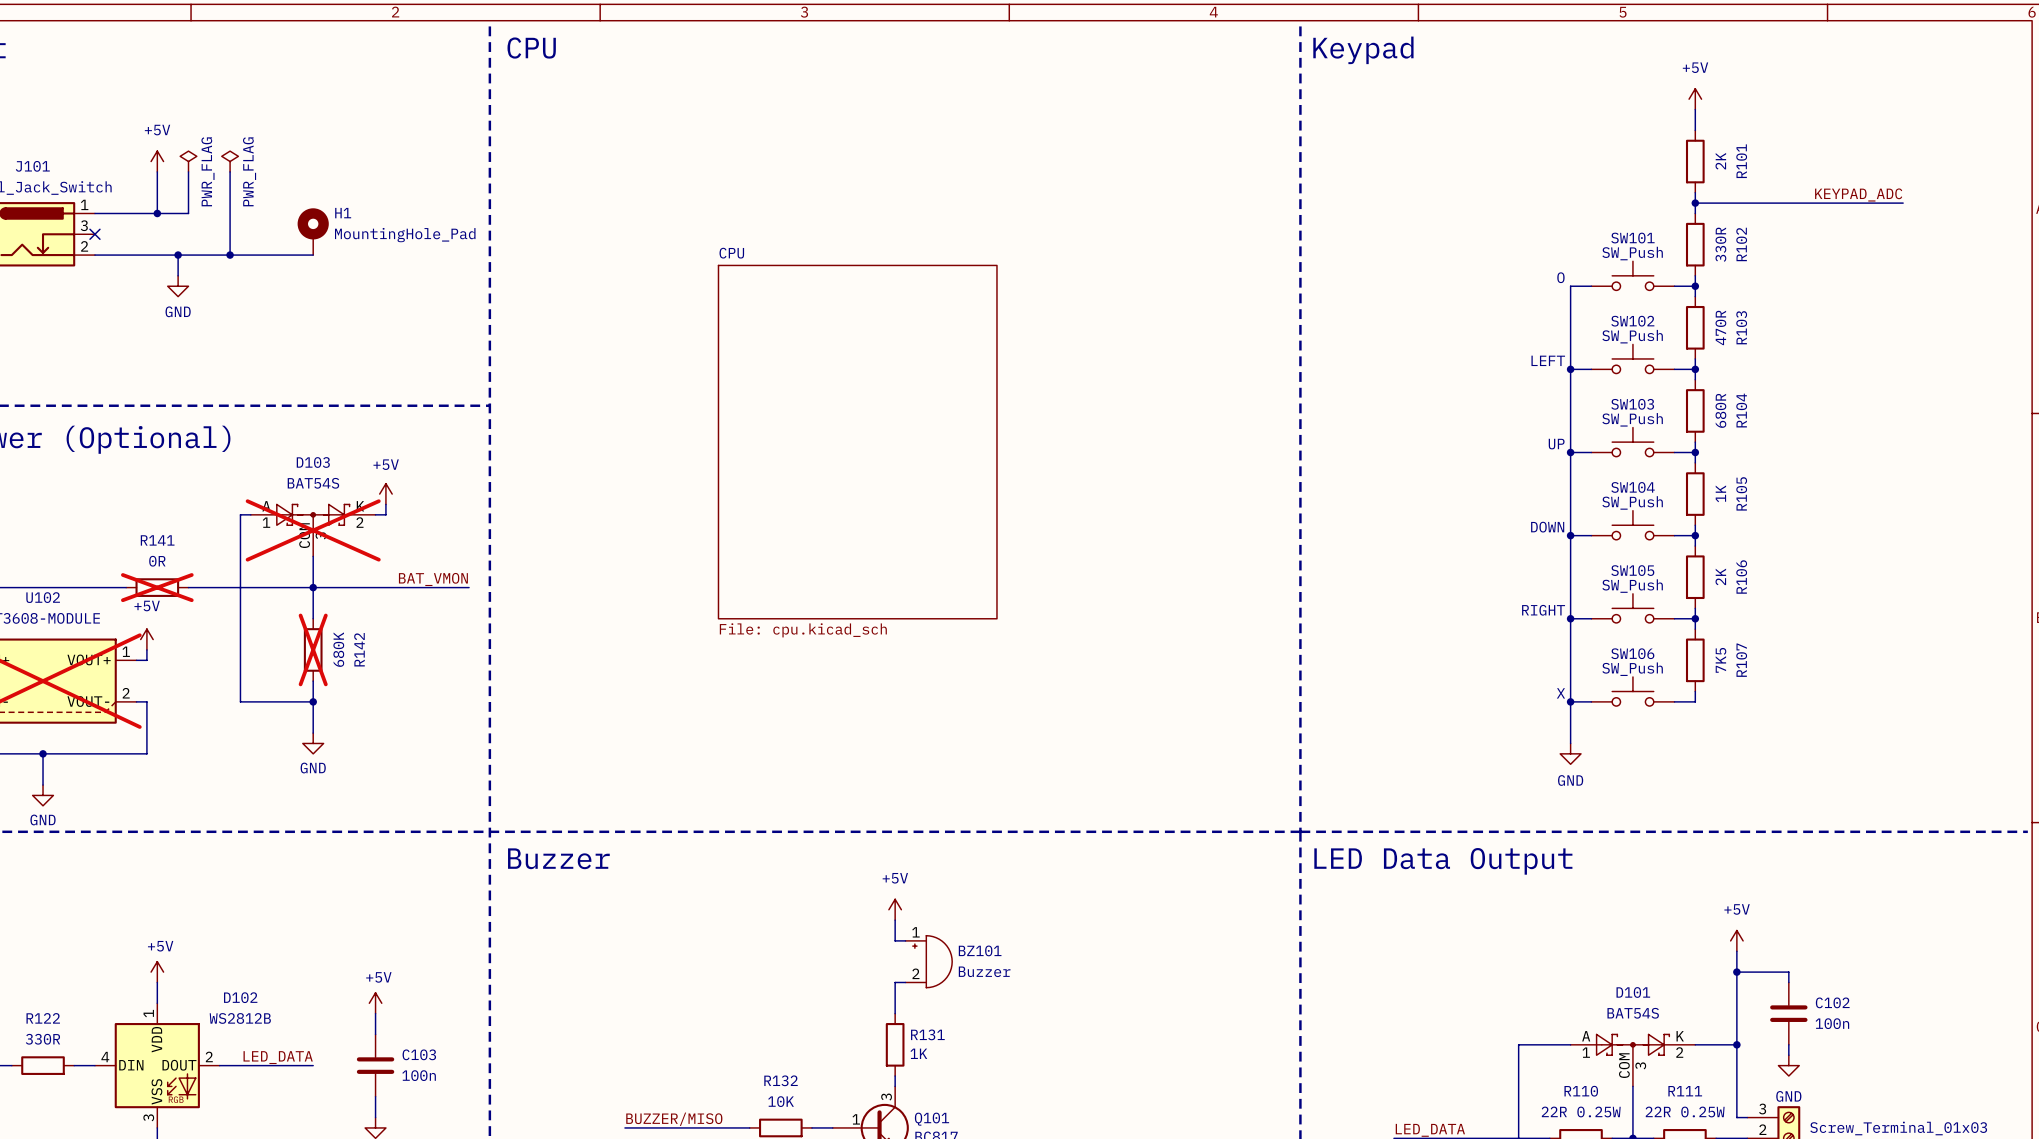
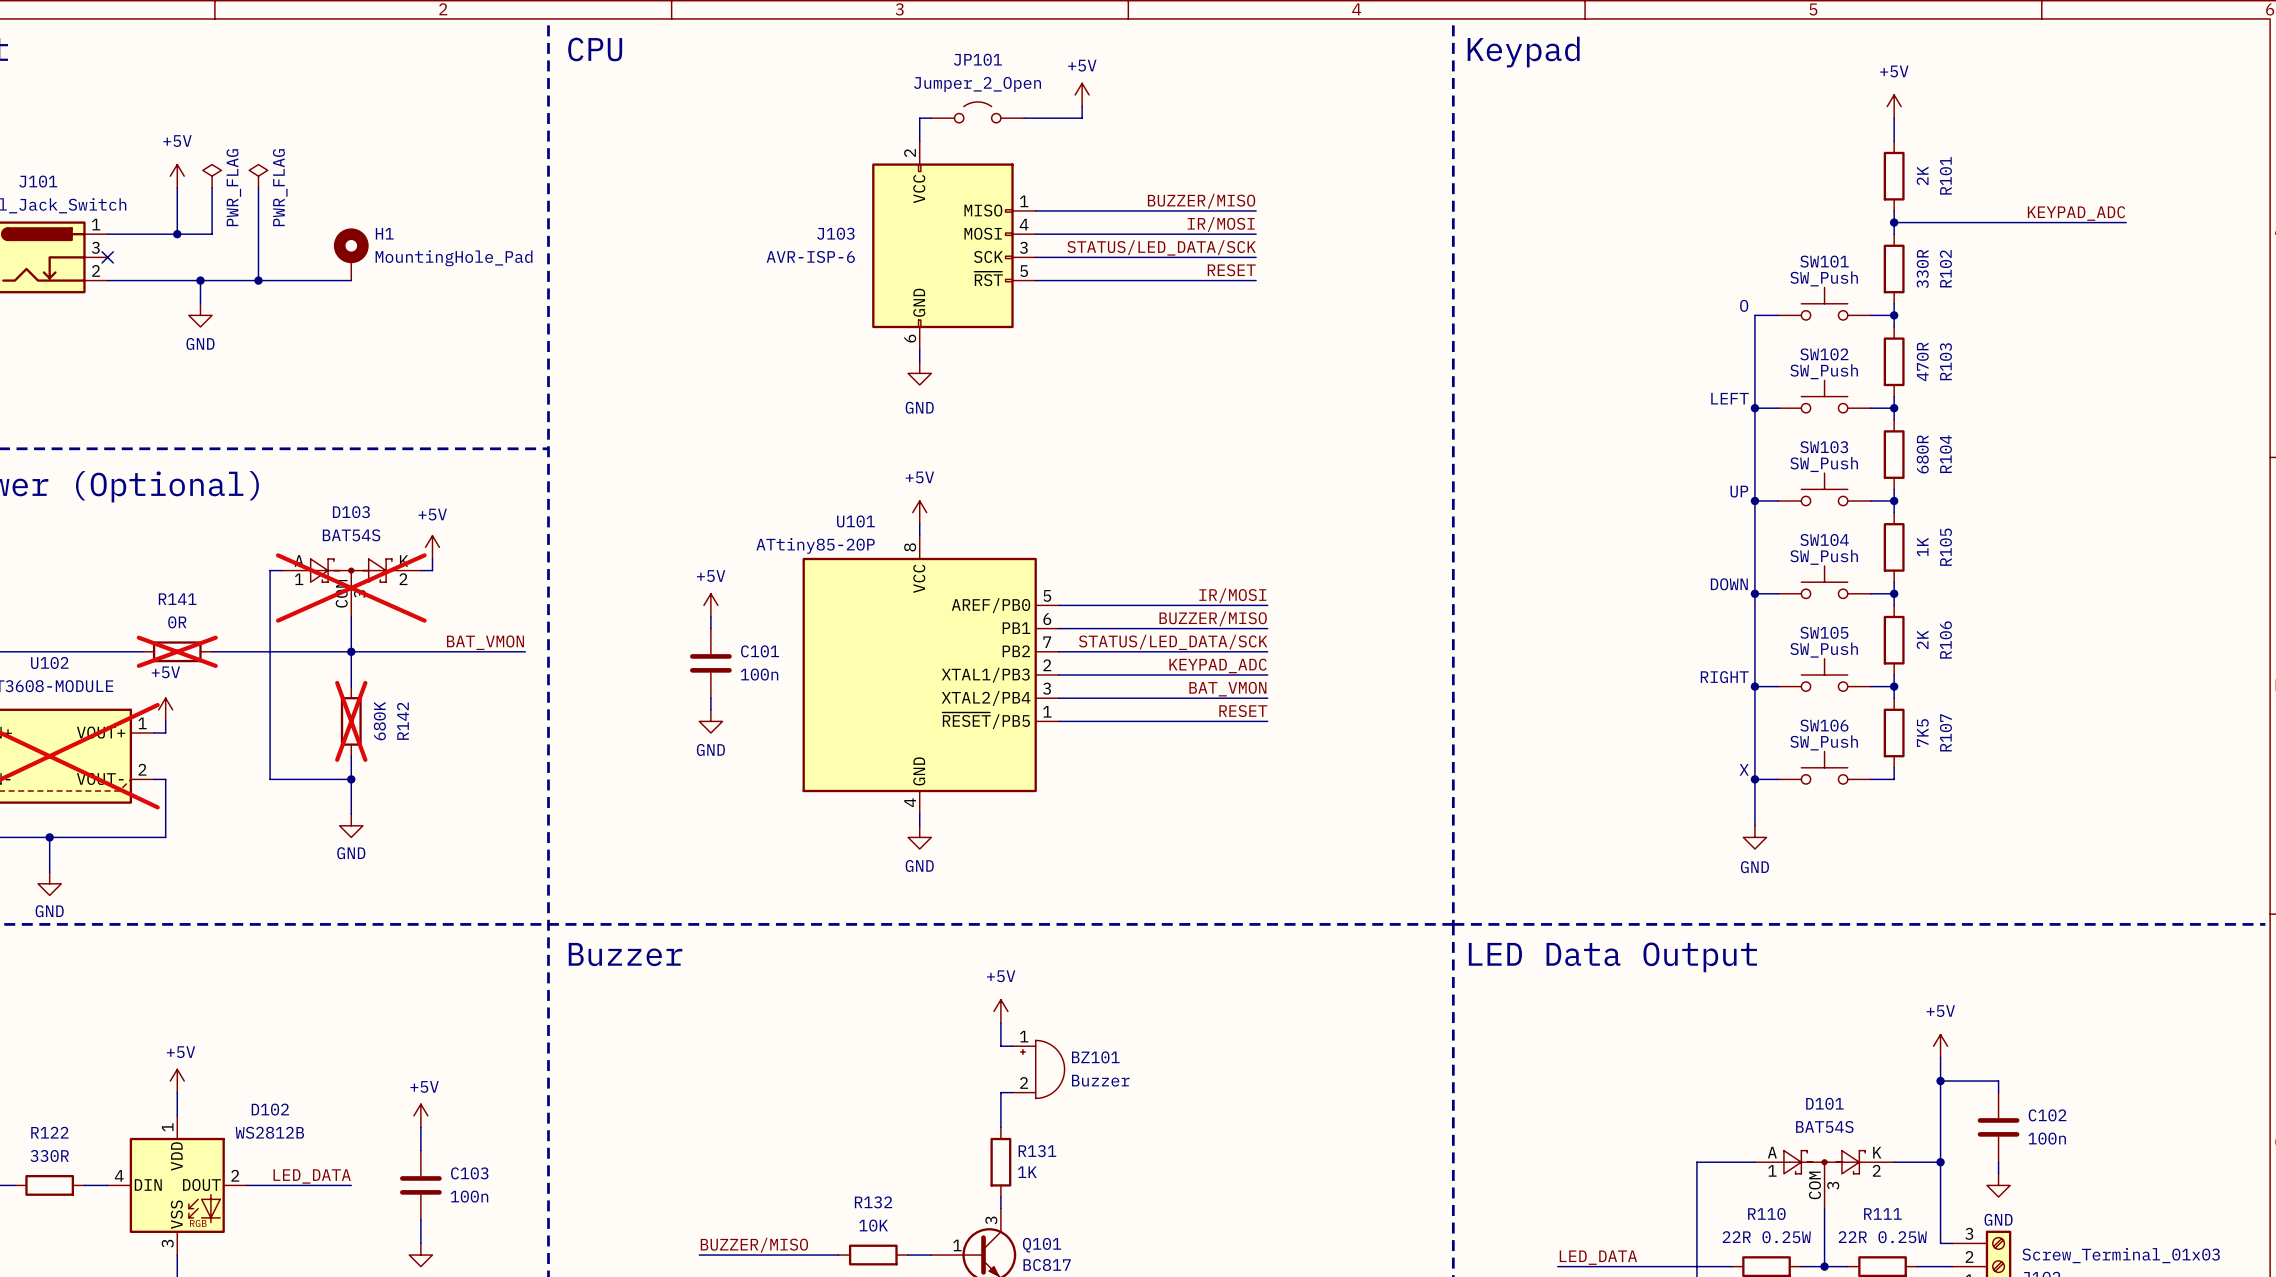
power symbol: none -> +5V (1082, 94)
wire: none -> (1082, 106) (1082, 118) (1024, 118)
JP101: none -> Jumper_2_Open (977, 112)
wire: none -> (931, 118) (919, 118) (919, 141)
label: none -> BUZZER/MISO (1201, 201)
wire: none -> (1035, 210) (1256, 210)
label: none -> IR/MOSI (1221, 224)
wire: none -> (1035, 234) (1256, 234)
J103: none -> AVR-ISP-6 (953, 245)
label: none -> STATUS/LED_DATA/SCK (1161, 247)
wire: none -> (1035, 257) (1256, 257)
label: none -> RESET (1231, 270)
wire: none -> (1035, 280) (1256, 280)
wire: none -> (919, 350) (919, 361)
power symbol: none -> GND (919, 373)
sheet CPU: File: cpu.kicad_sch (857, 442) -> none
power symbol: none -> +5V (919, 512)
wire: none -> (919, 524) (919, 535)
label: none -> IR/MOSI (1232, 595)
power symbol: none -> +5V (710, 605)
wire: none -> (1058, 605) (1267, 605)
wire: none -> (710, 617) (710, 628)
label: none -> BUZZER/MISO (1213, 618)
wire: none -> (1058, 628) (1267, 628)
label: none -> STATUS/LED_DATA/SCK (1173, 642)
wire: none -> (1058, 651) (1267, 651)
C101: none -> 100n (710, 663)
label: none -> KEYPAD_ADC (1218, 665)
U101: none -> ATtiny85-20P (930, 675)
wire: none -> (1058, 675) (1267, 675)
label: none -> BAT_VMON (1227, 689)
wire: none -> (710, 698) (710, 709)
wire: none -> (1058, 698) (1267, 698)
label: none -> RESET (1243, 711)
power symbol: none -> GND (710, 721)
wire: none -> (1058, 721) (1267, 721)
wire: none -> (919, 814) (919, 825)
power symbol: none -> GND (919, 837)

